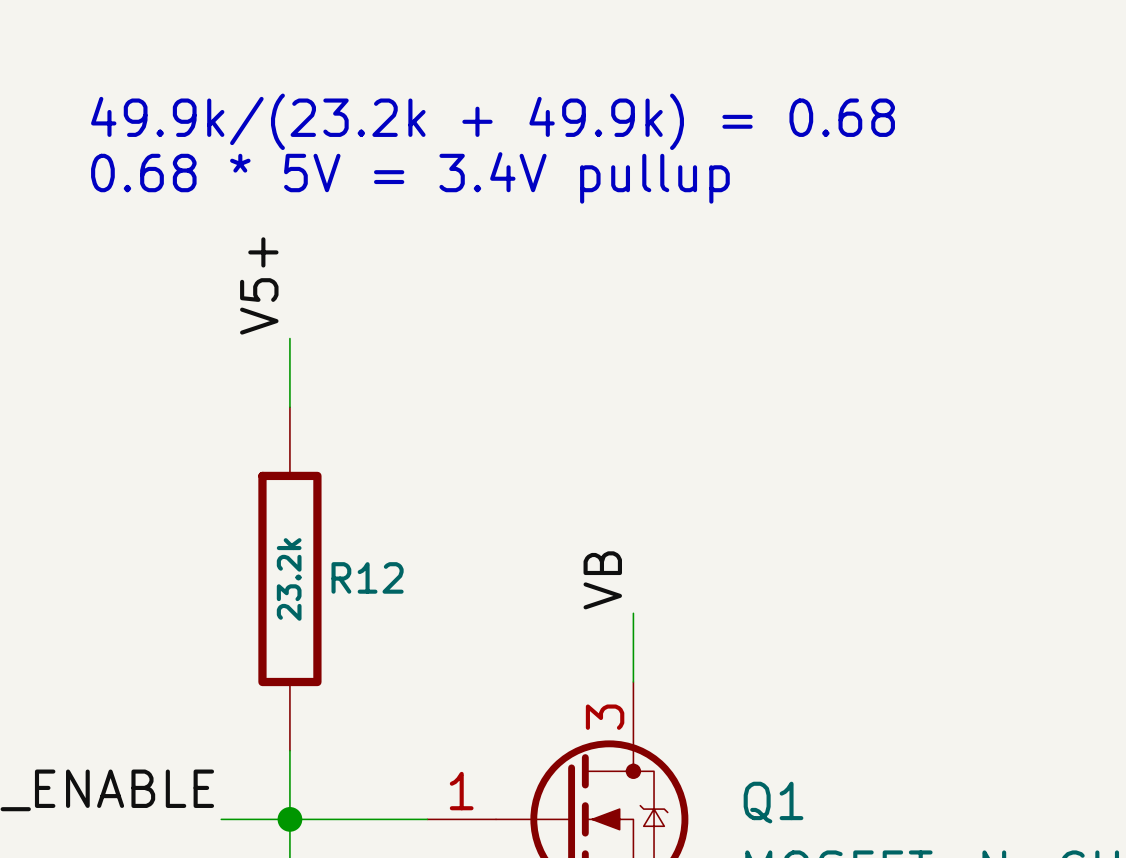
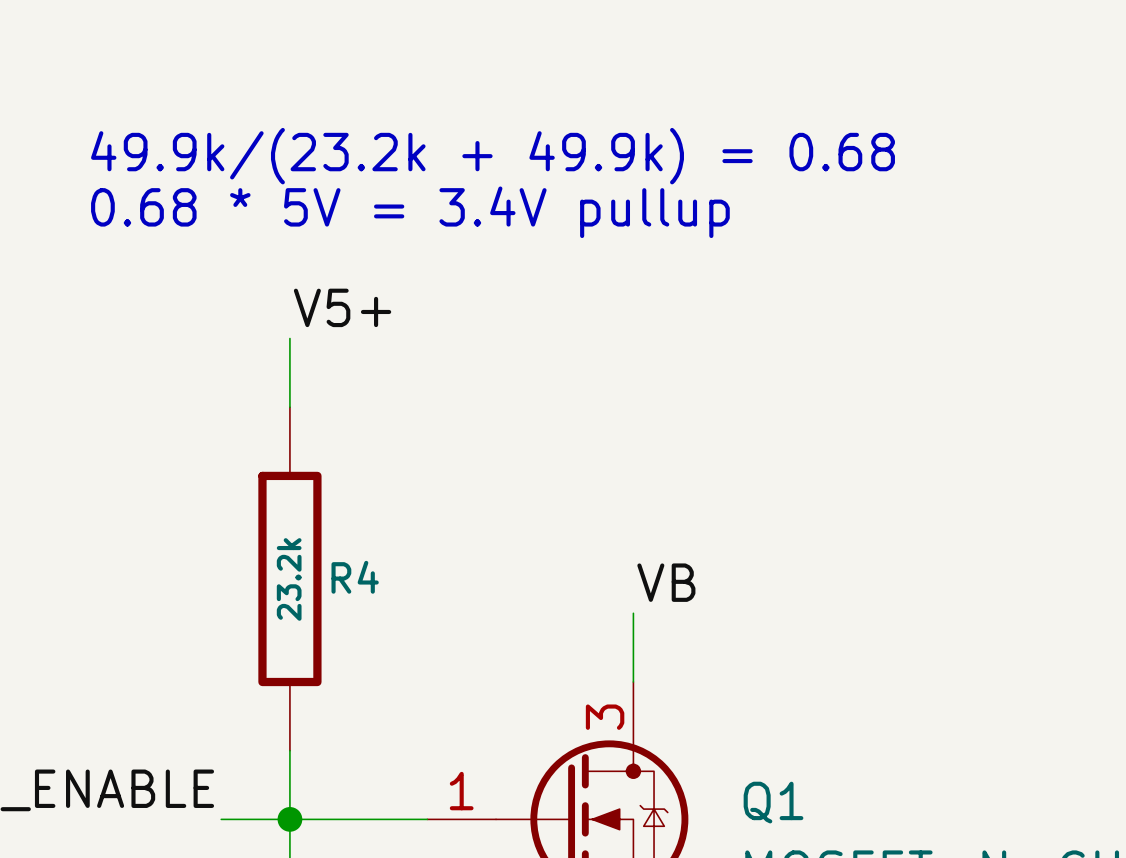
text position: 49.9k/(23.2k + 49.9k) = 0.68 (493, 121) -> 49.9k/(23.2k + 49.9k) = 0.68 (493, 156)
text position: 0.68 * 5V = 3.4V pullup (410, 177) -> 0.68 * 5V = 3.4V pullup (410, 212)
label rotation: 0° (259, 285) -> 90° clockwise (342, 307)
R12 name: R12 (367, 577) -> R4 (355, 577)
label rotation: 0° (602, 580) -> 90° clockwise (666, 582)

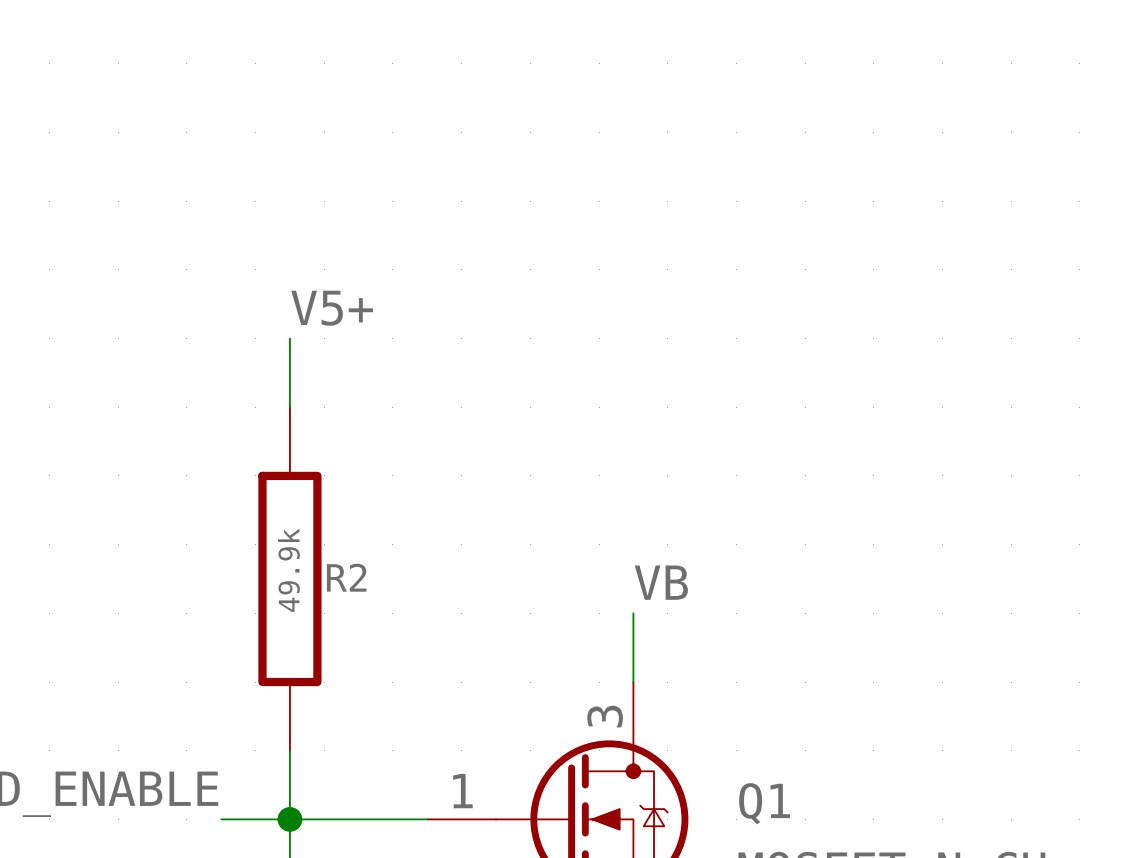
text: 49.9k/(23.2k + 49.9k) = 0.68 (493, 156) -> none
text: 0.68 * 5V = 3.4V pullup (410, 212) -> none
R4 name: R4 (355, 577) -> R2 (346, 577)
R4 value: 23.2k (289, 579) -> 49.9k (288, 570)

